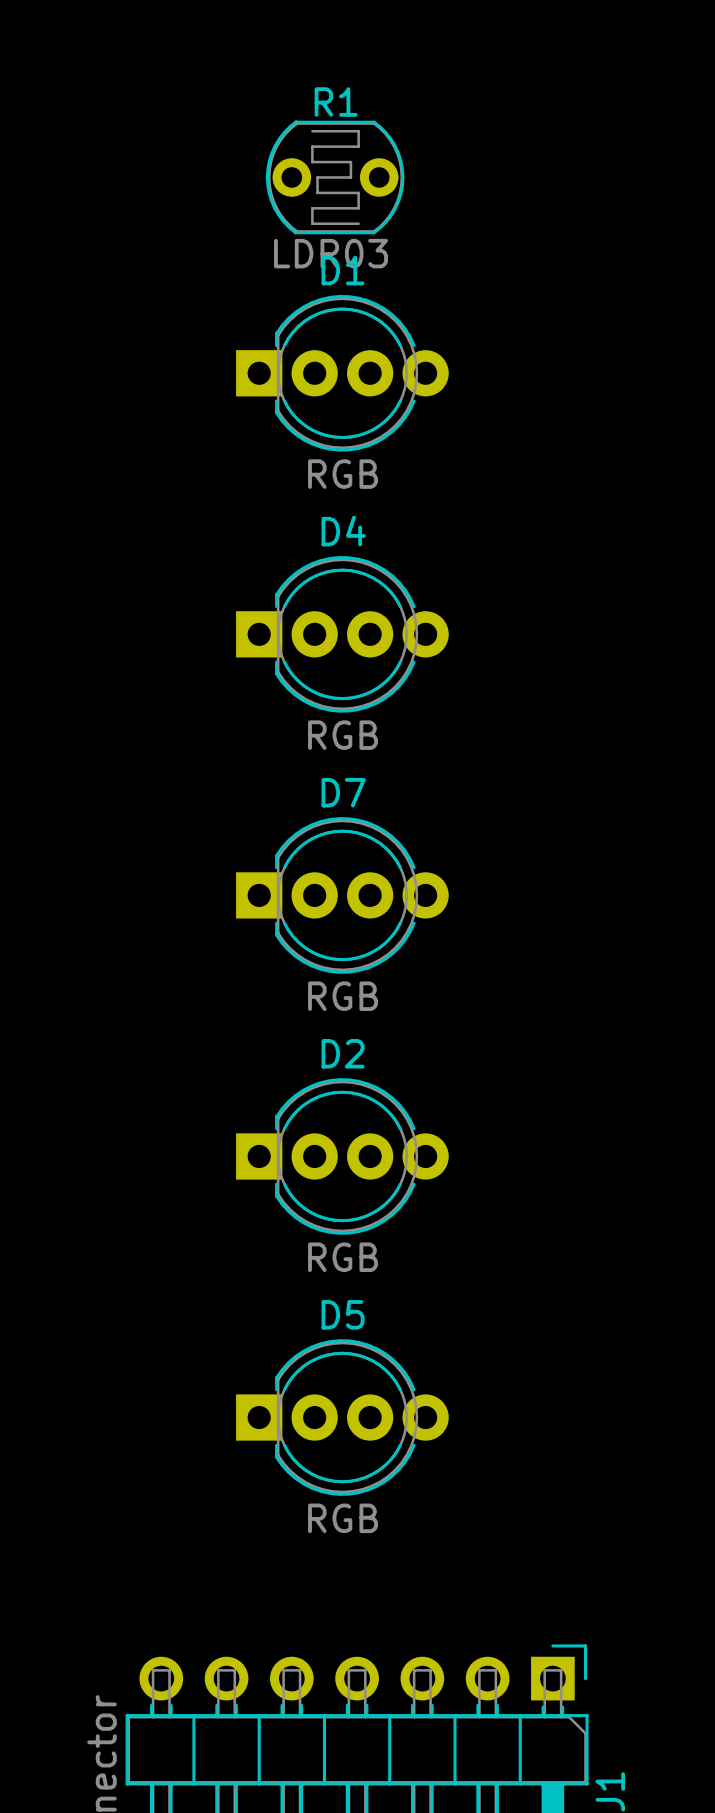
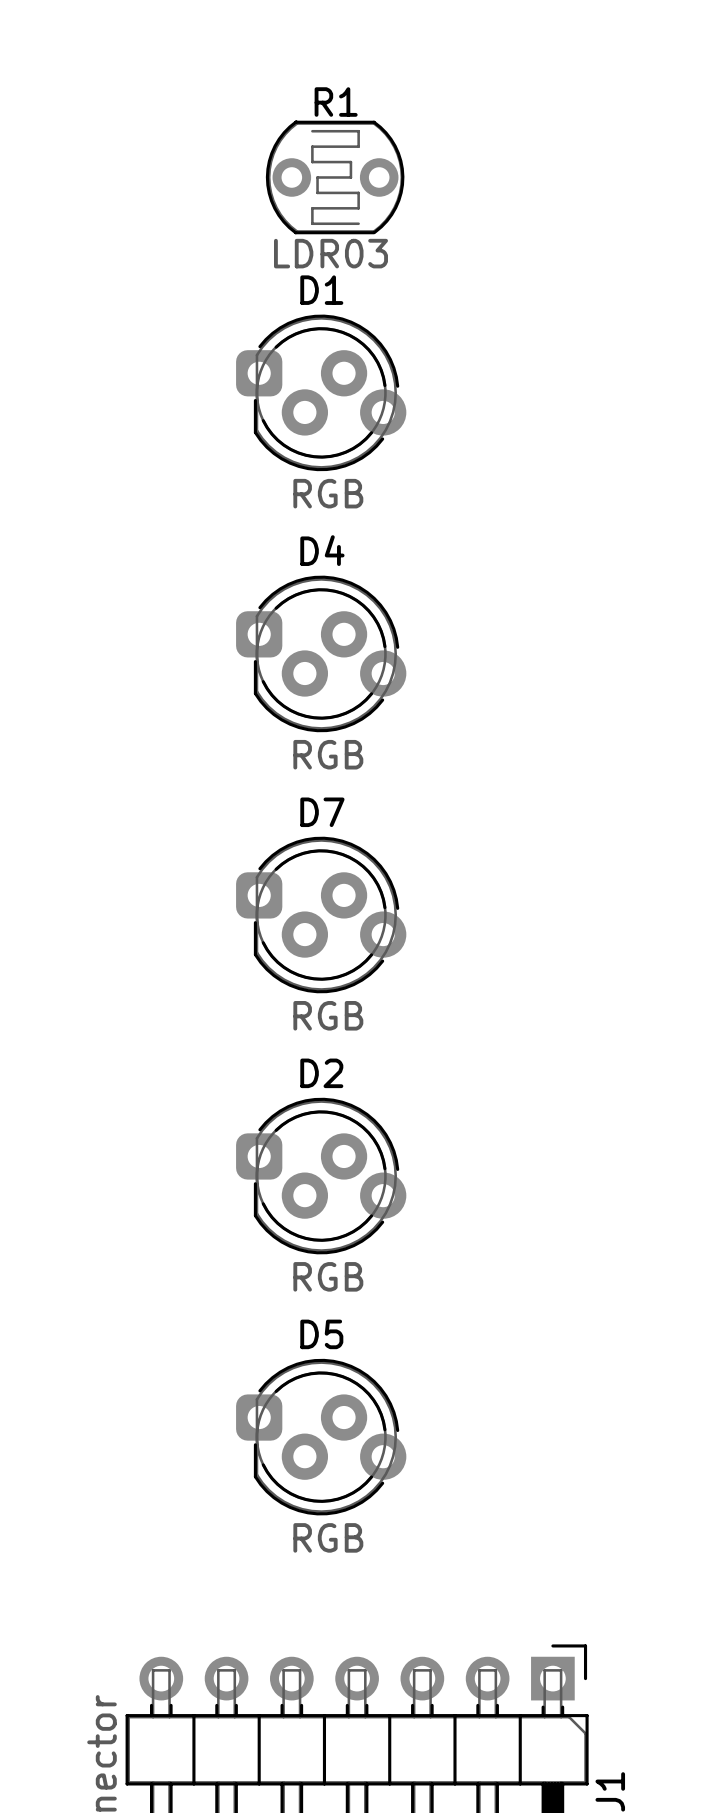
D1 footprint: [236, 294, 449, 452] -> [236, 314, 407, 472]
D4 footprint: [236, 556, 449, 713] -> [236, 575, 407, 733]
D7 footprint: [236, 817, 449, 974] -> [236, 836, 407, 994]
D2 footprint: [236, 1078, 449, 1235] -> [236, 1097, 407, 1255]
D5 footprint: [236, 1339, 449, 1496] -> [236, 1358, 407, 1516]

